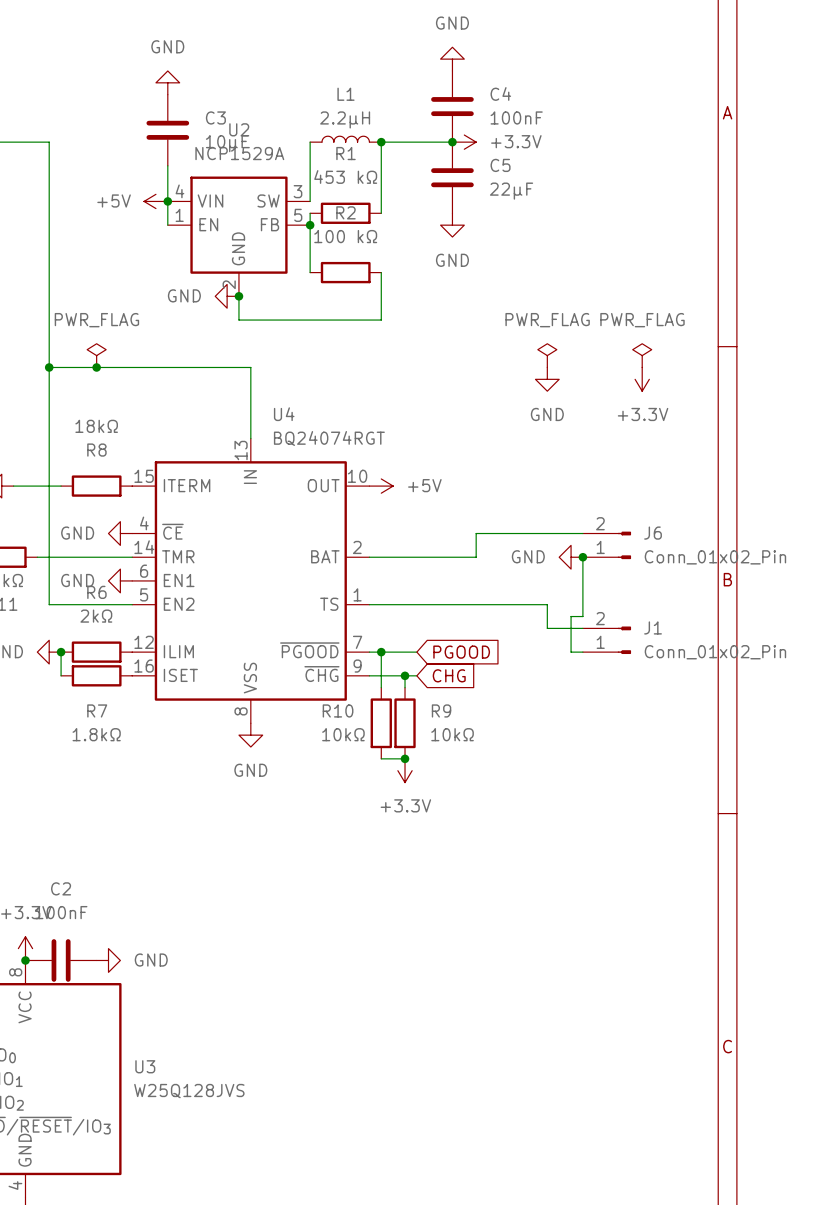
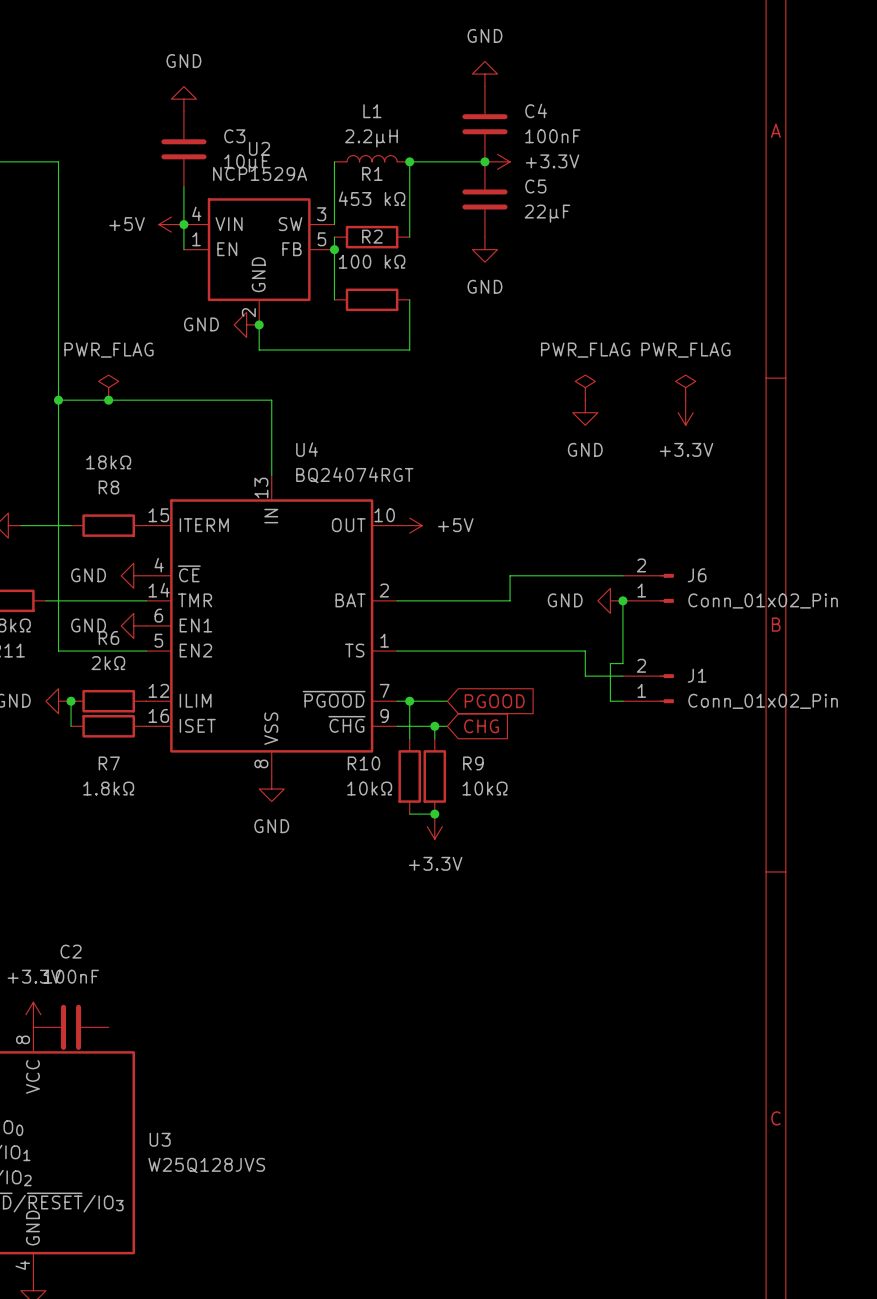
junction: (25, 960) -> none
power symbol: GND (108, 960) -> none

